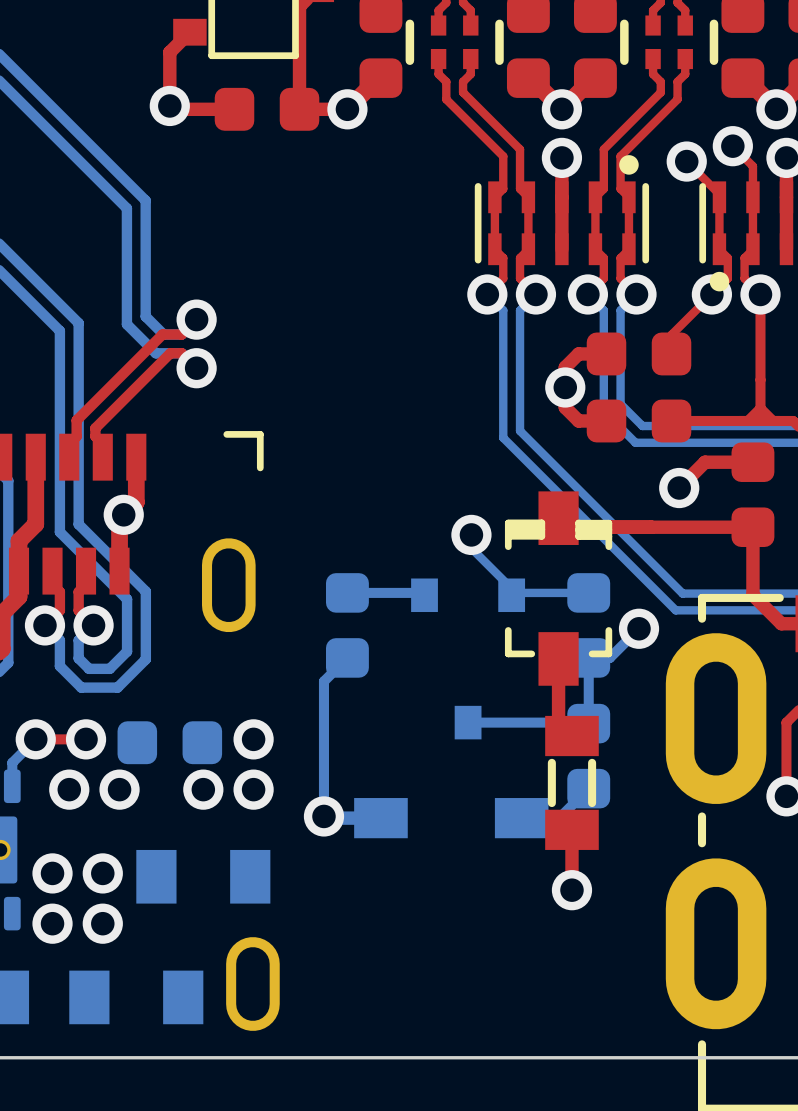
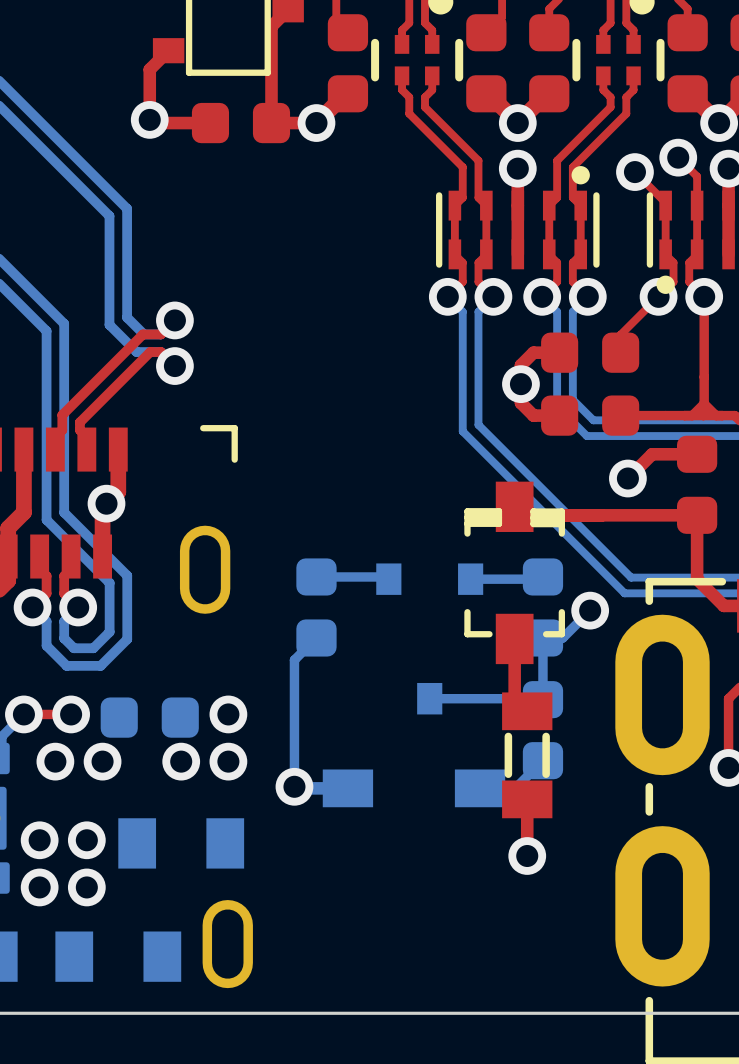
bottom track: (471, 534) (471, 548) (511, 588) (511, 595) (514, 592) (588, 592) -> (470, 579) (540, 579) (542, 576)
via: (471, 534) -> none

